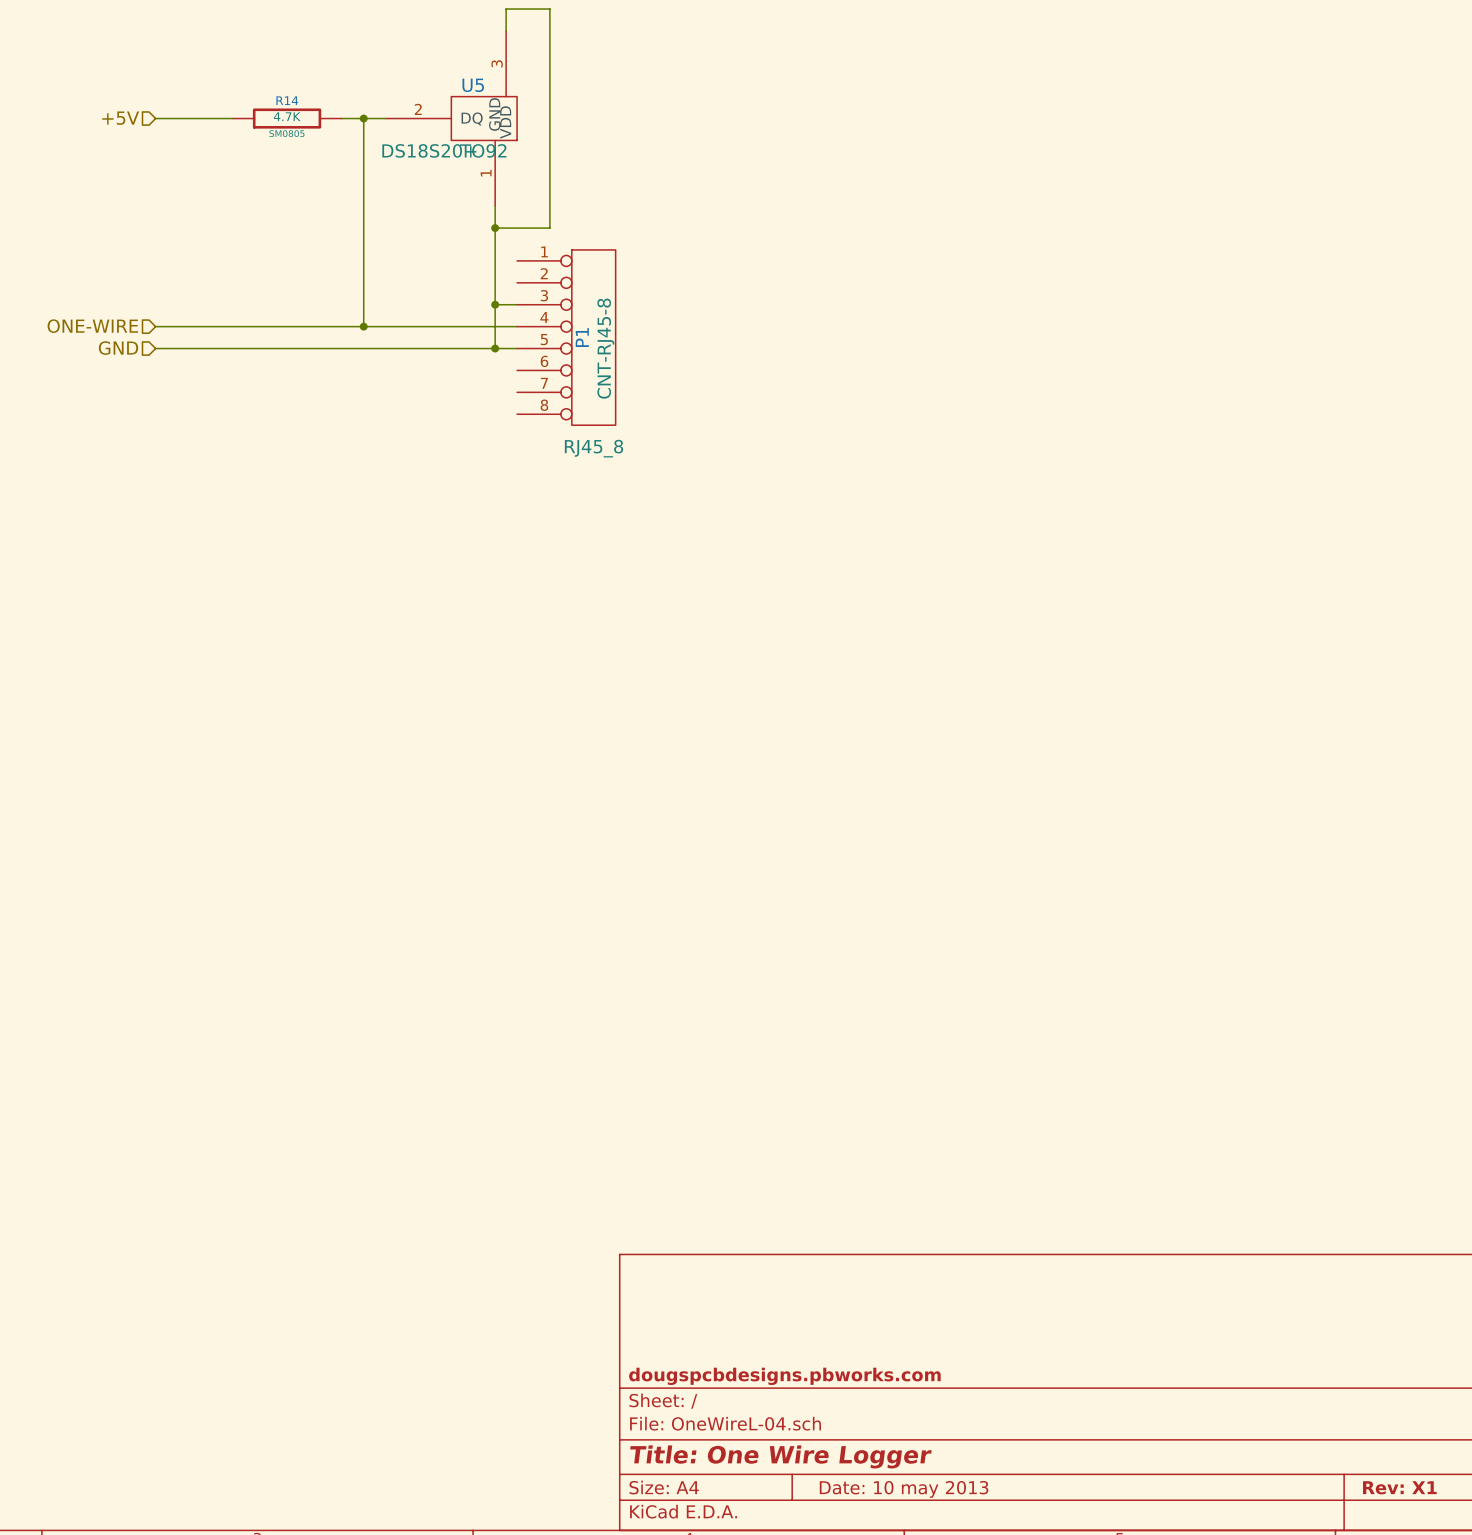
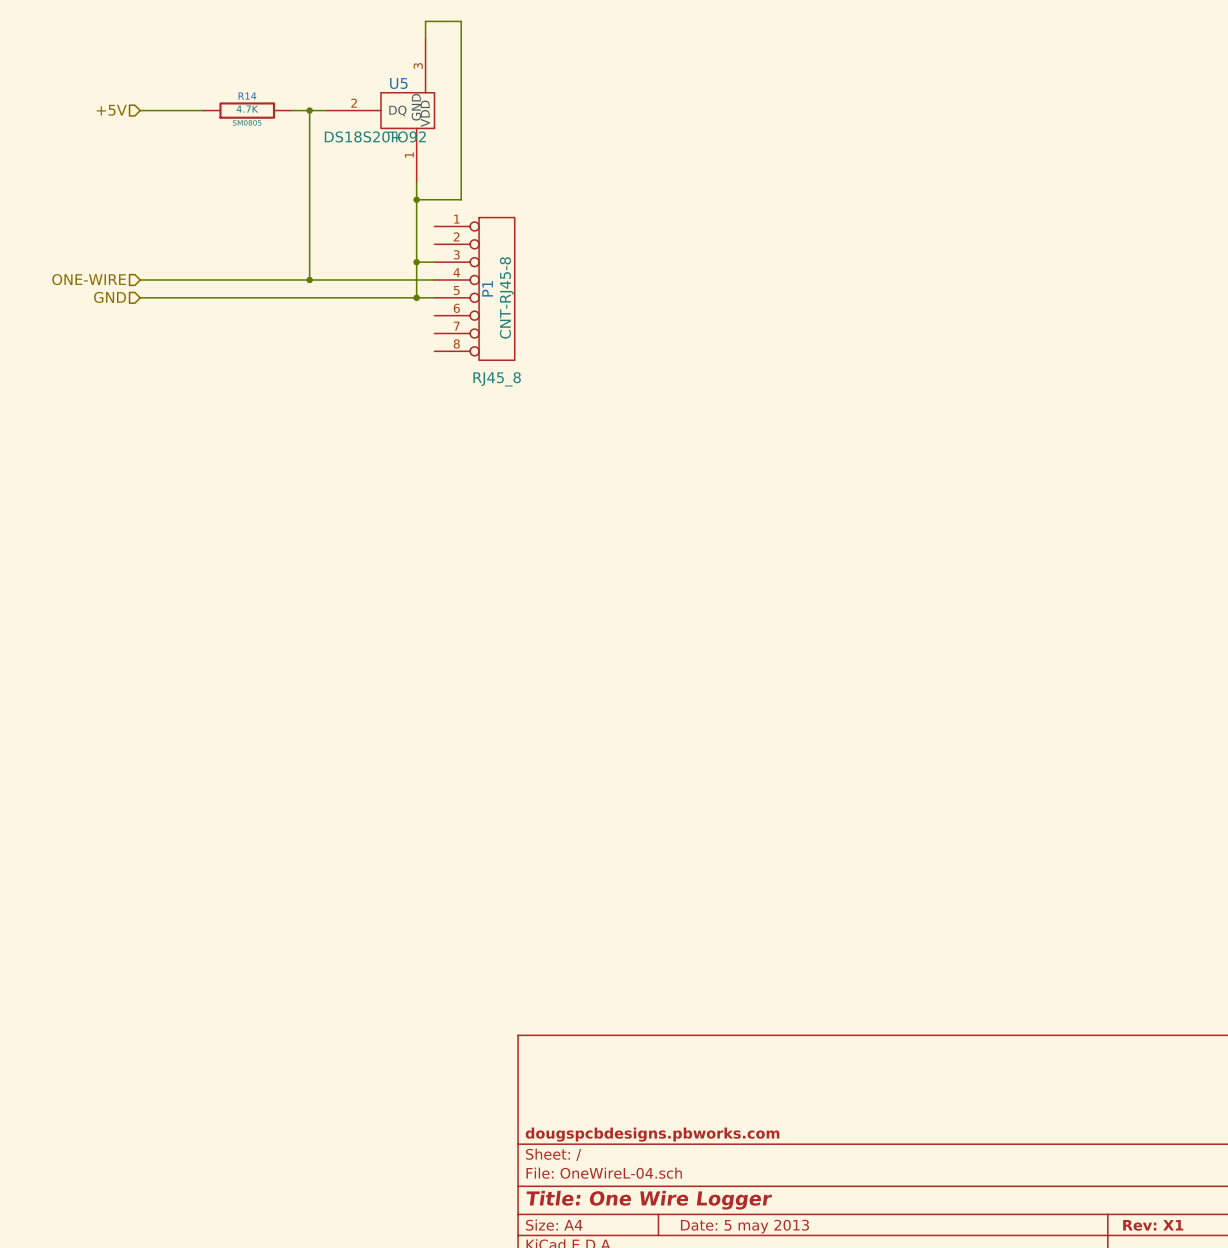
title block: Date: 10 may 2013 (904, 1489) -> Date: 5 may 2013 (744, 1226)

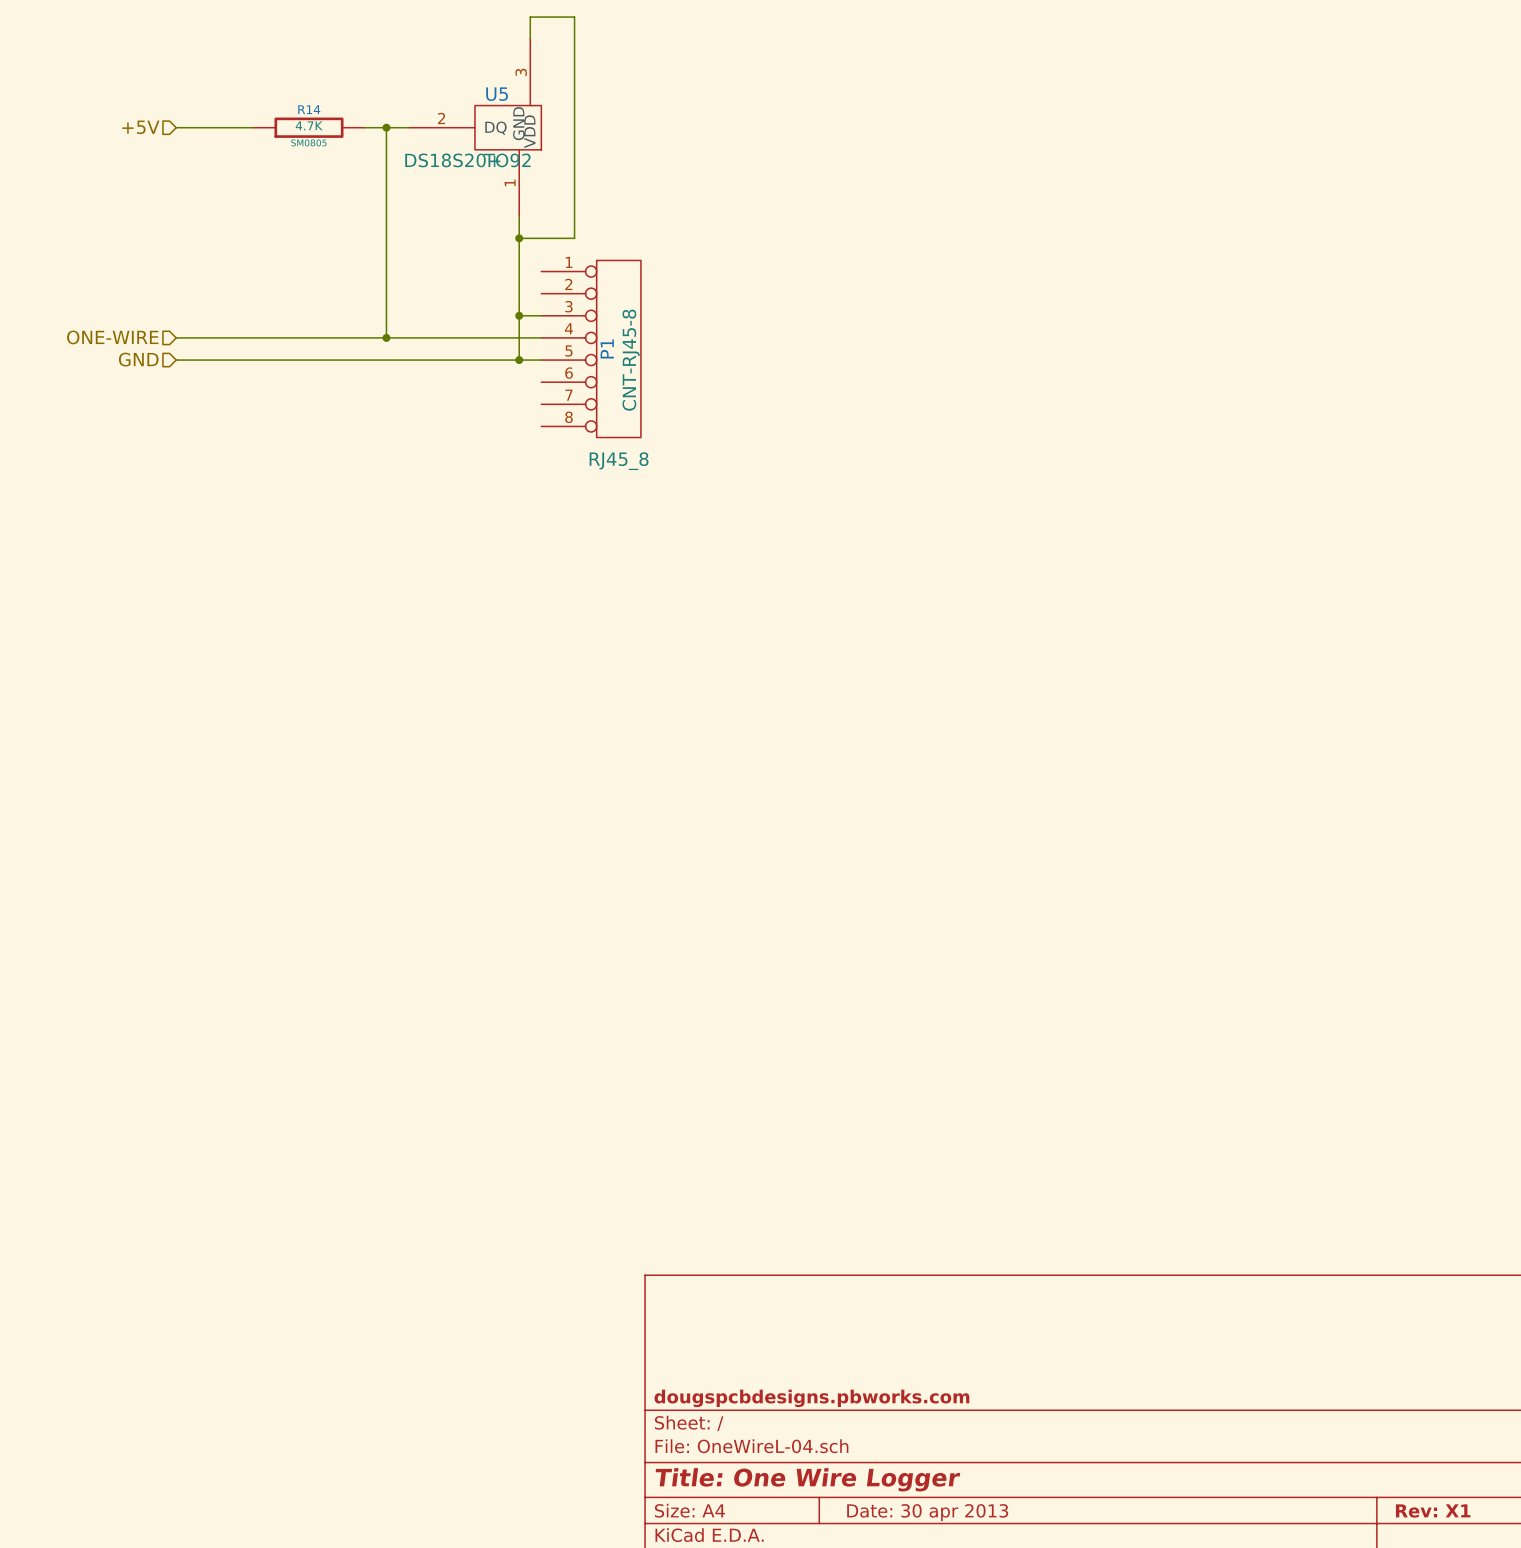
title block: Date: 5 may 2013 (744, 1226) -> Date: 30 apr 2013 (927, 1512)

